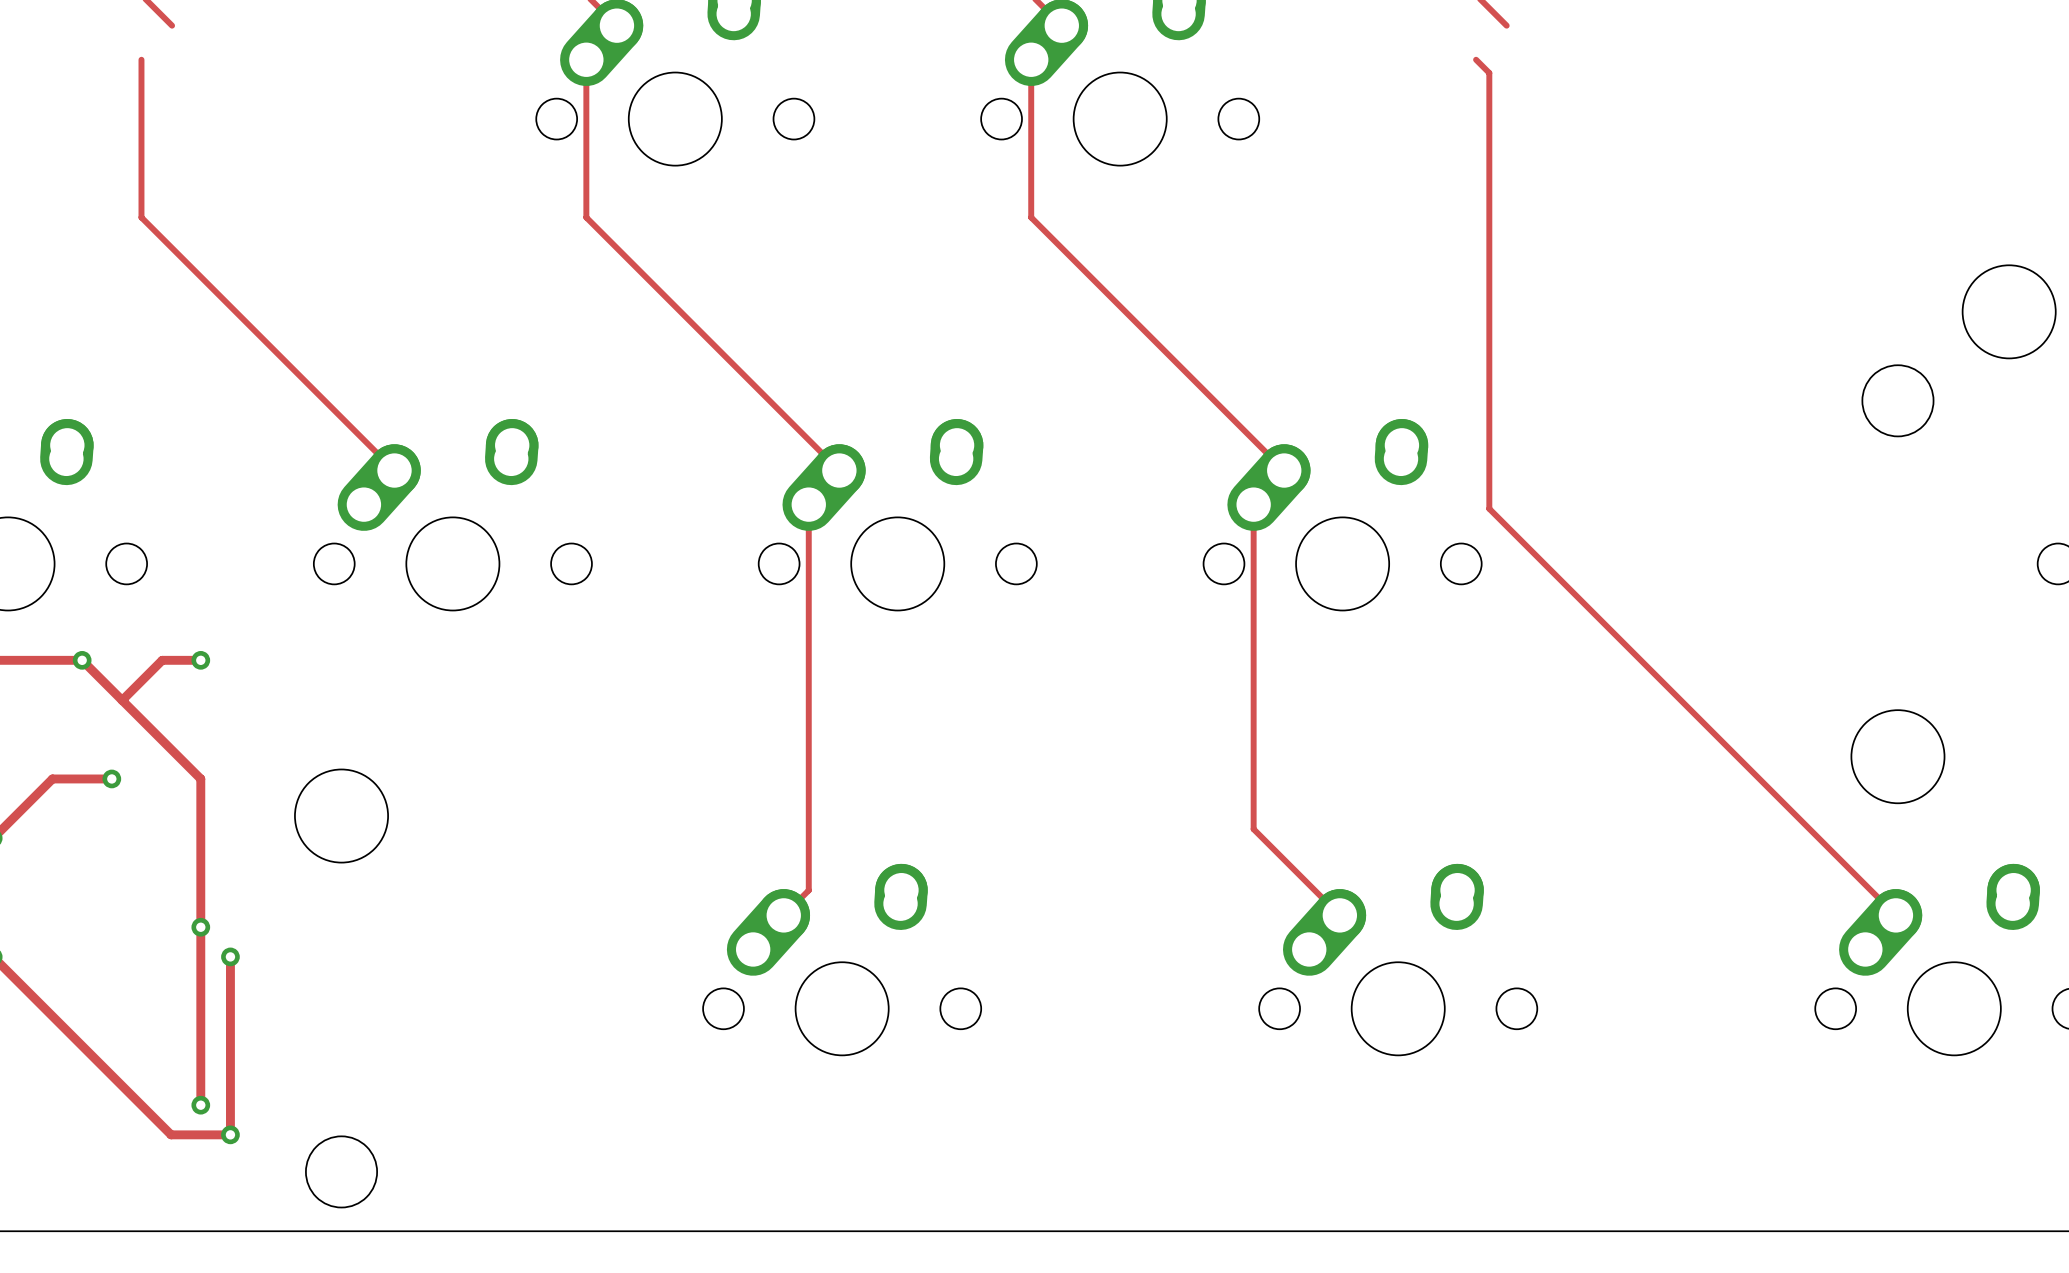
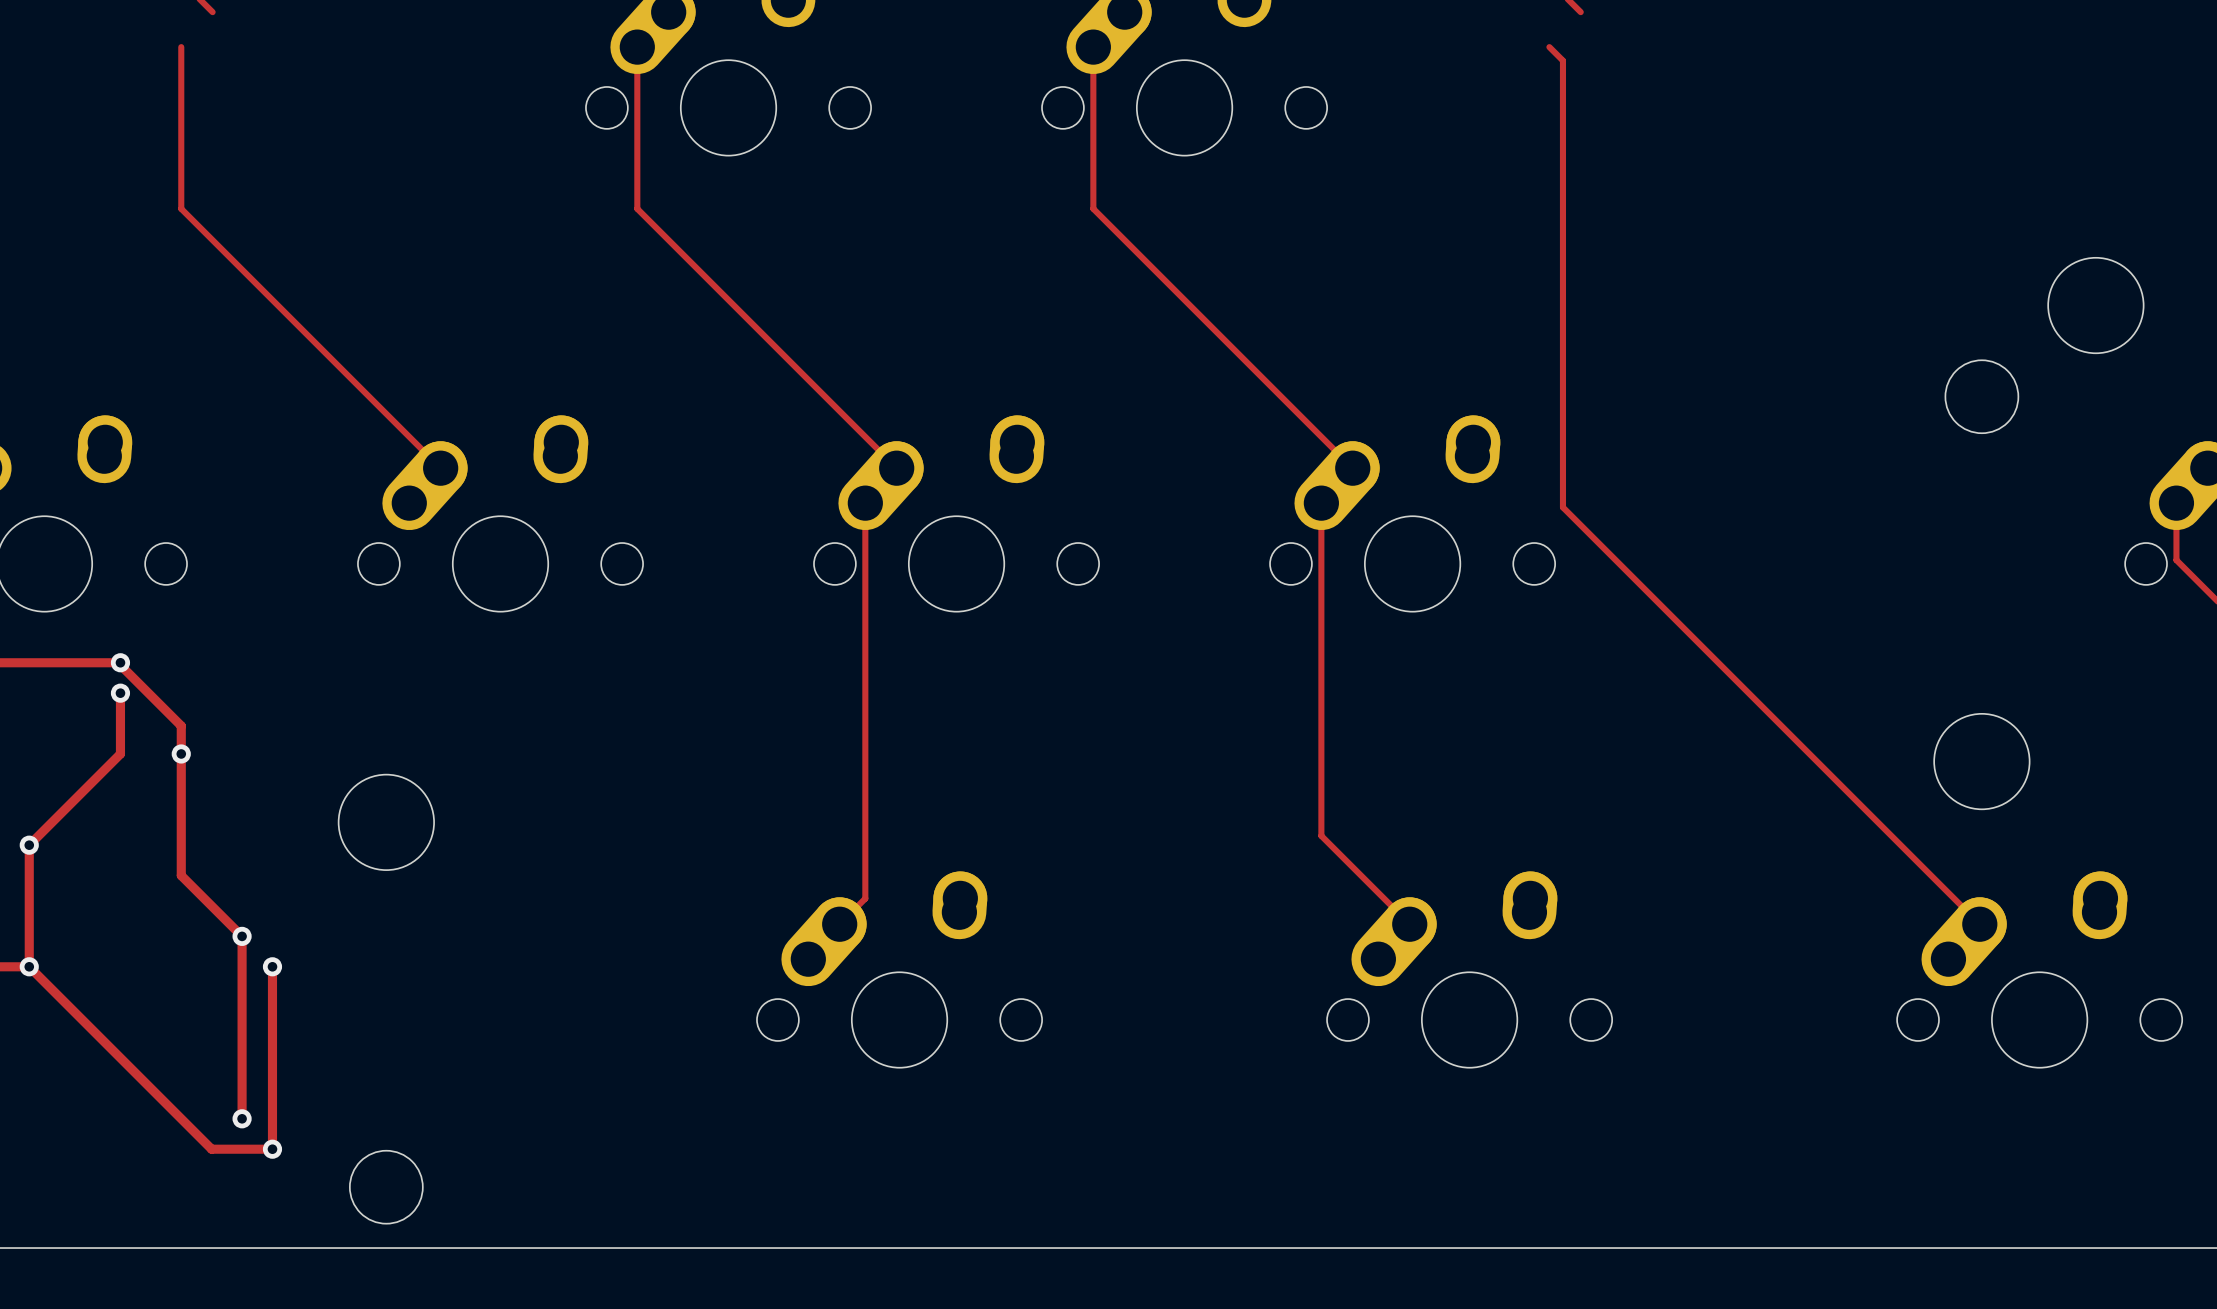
track: (82, 660) (200, 778) (200, 927) -> (120, 665) (181, 725) (181, 875) (242, 936)
track: (200, 660) (162, 660) (122, 700) -> none
via: (200, 660) -> none
via: none -> (120, 693)
track: (52, 778) (111, 778) -> (90, 784) (120, 753) (120, 693)
via position: (111, 778) -> (181, 753)

